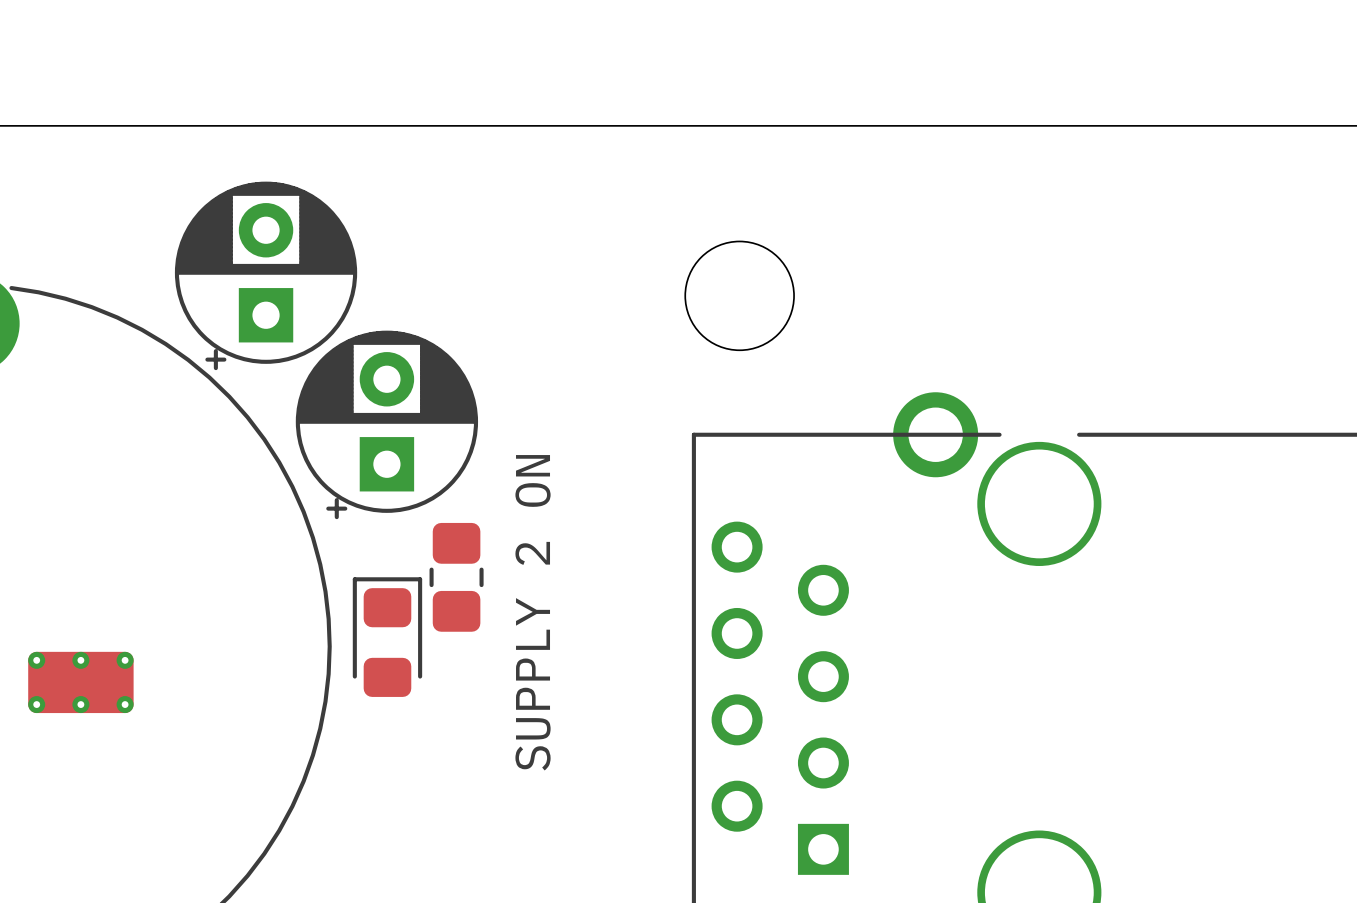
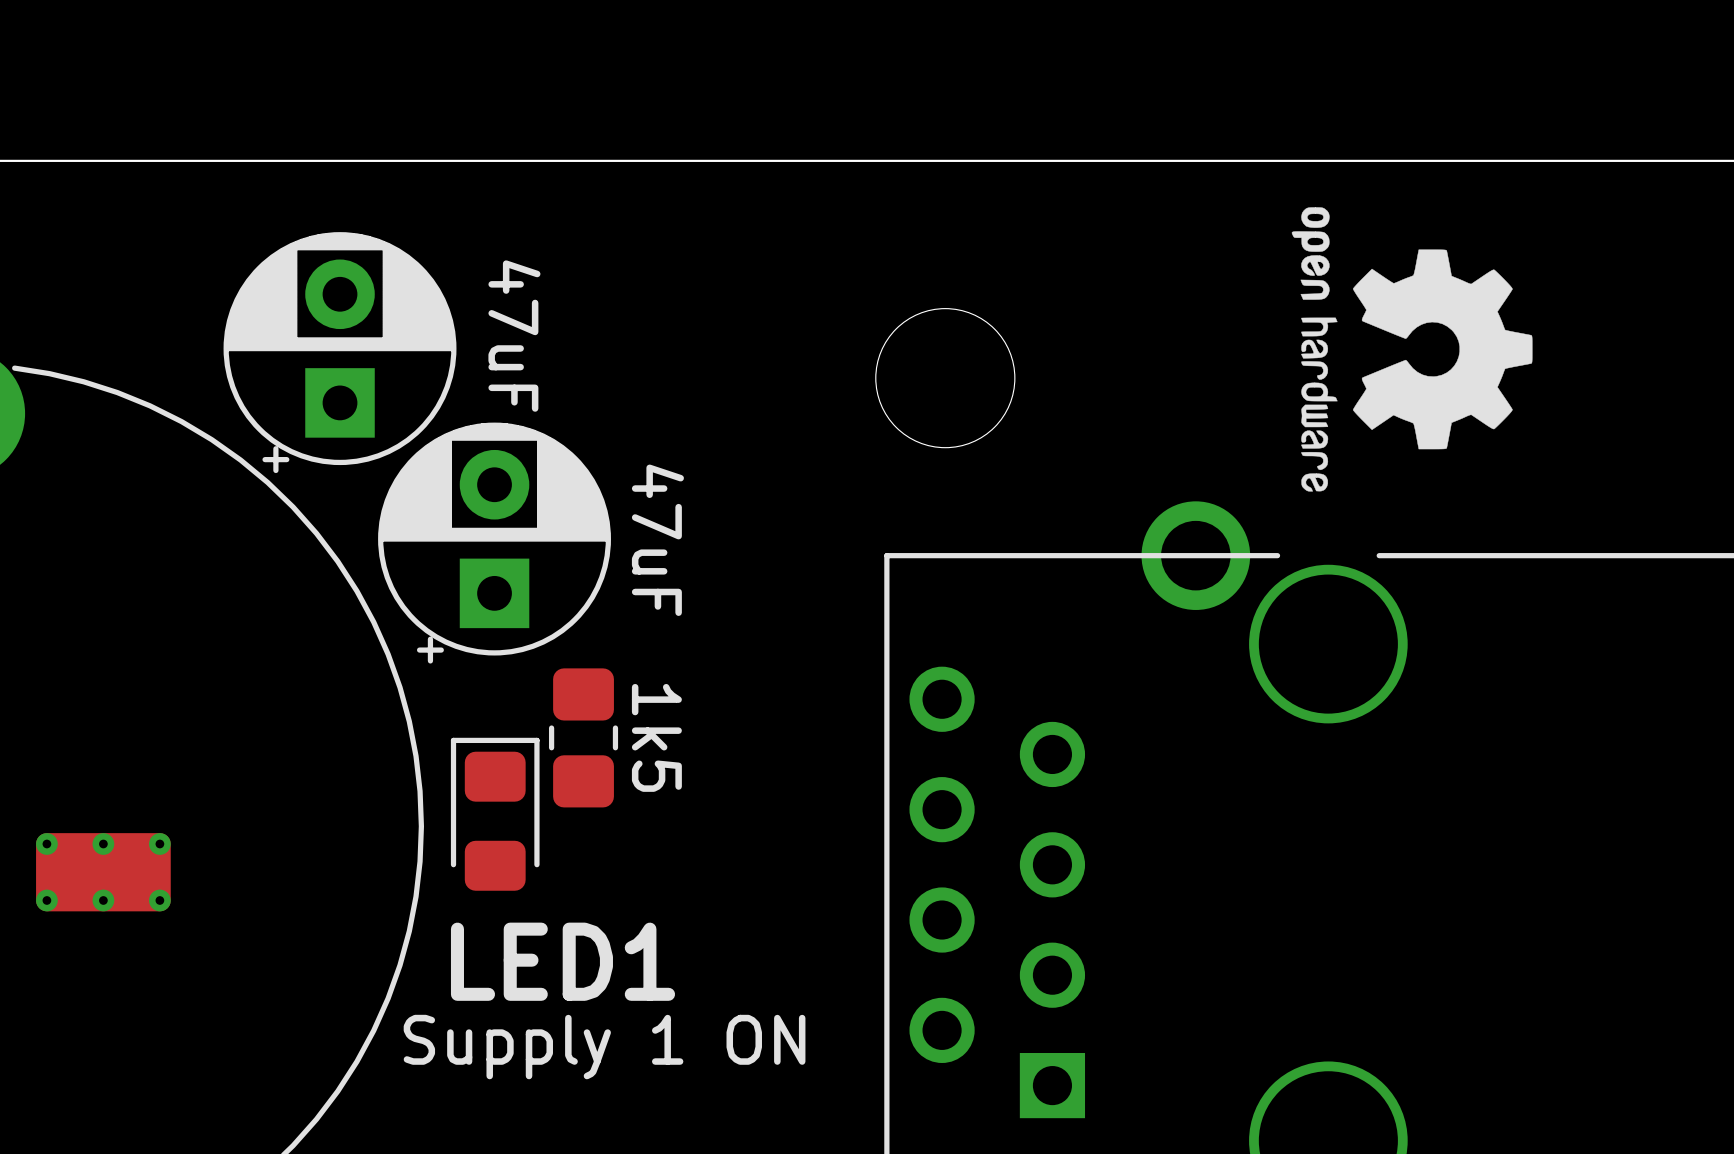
drawing: none -> [1291, 207, 1533, 492]
text: none -> 47uF (514, 336)
text: none -> 47uF (657, 540)
text: none -> 1k5 (656, 737)
text: SUPPLY 2 ON (533, 612) -> none
text: none -> LED1 (563, 961)
text: none -> Supply 1 ON (604, 1047)

